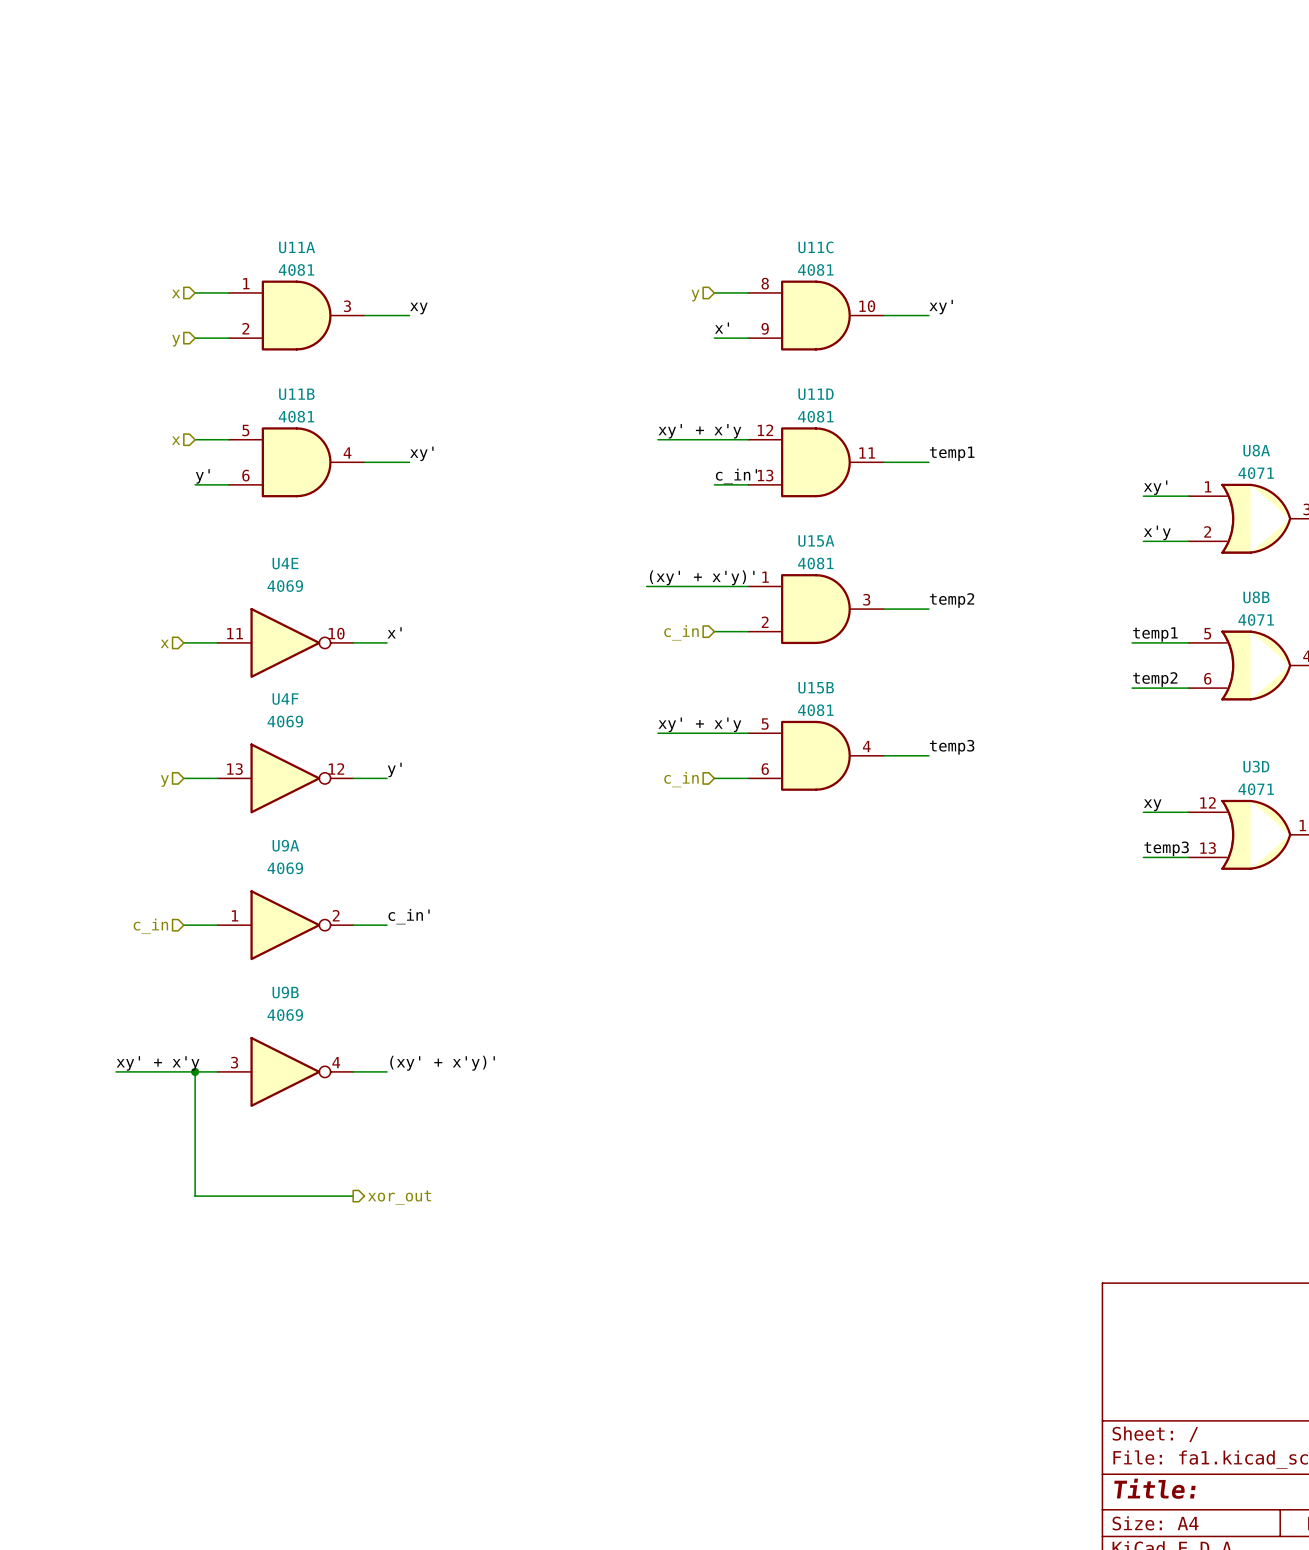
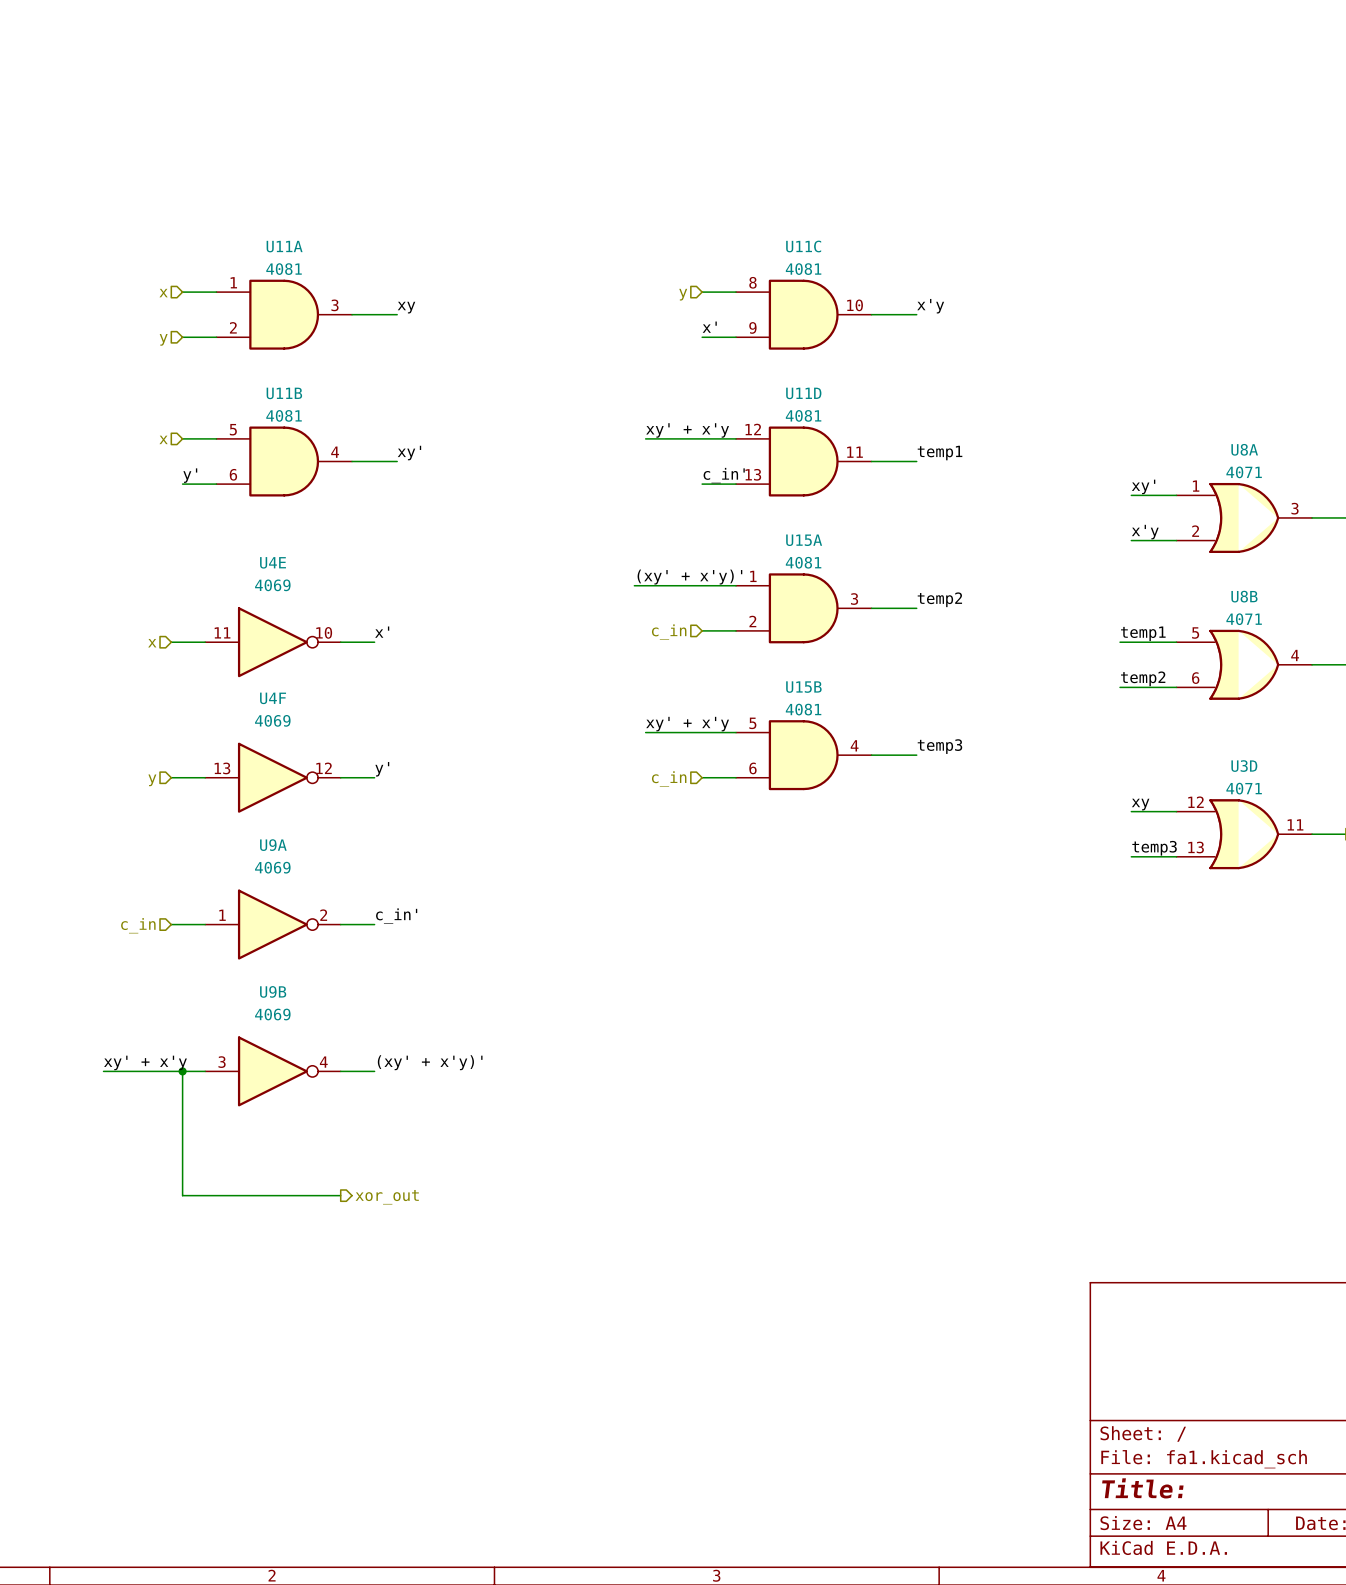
label: xy' (941, 307) -> x'y (930, 306)

